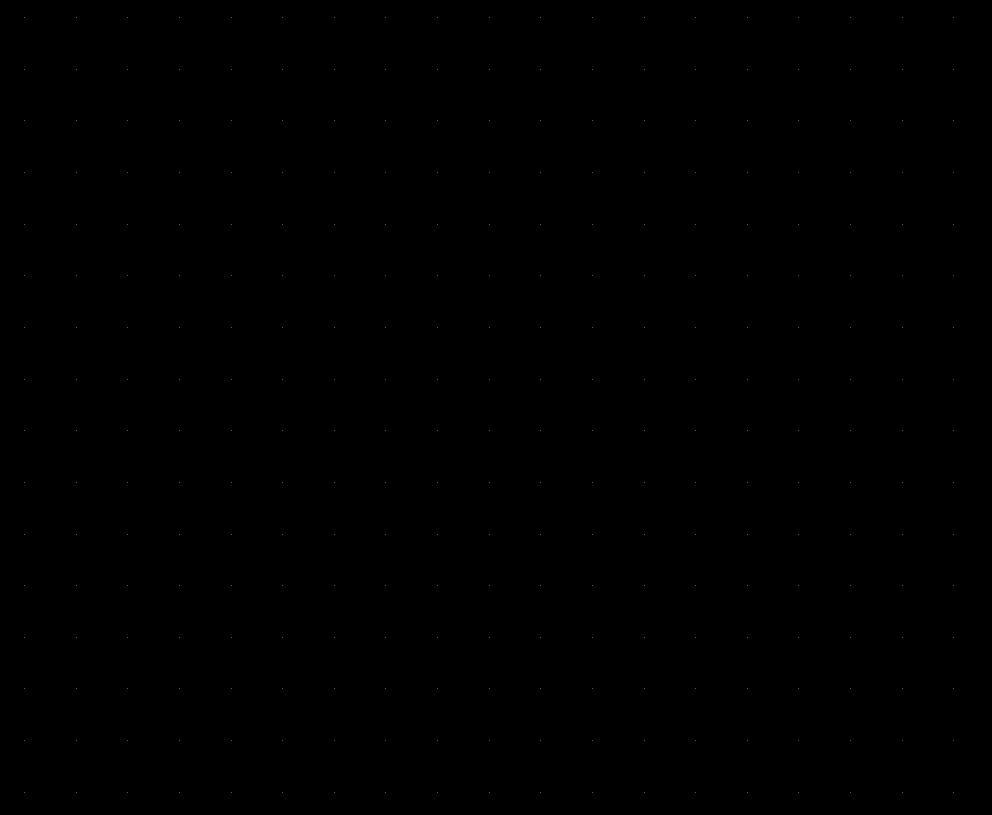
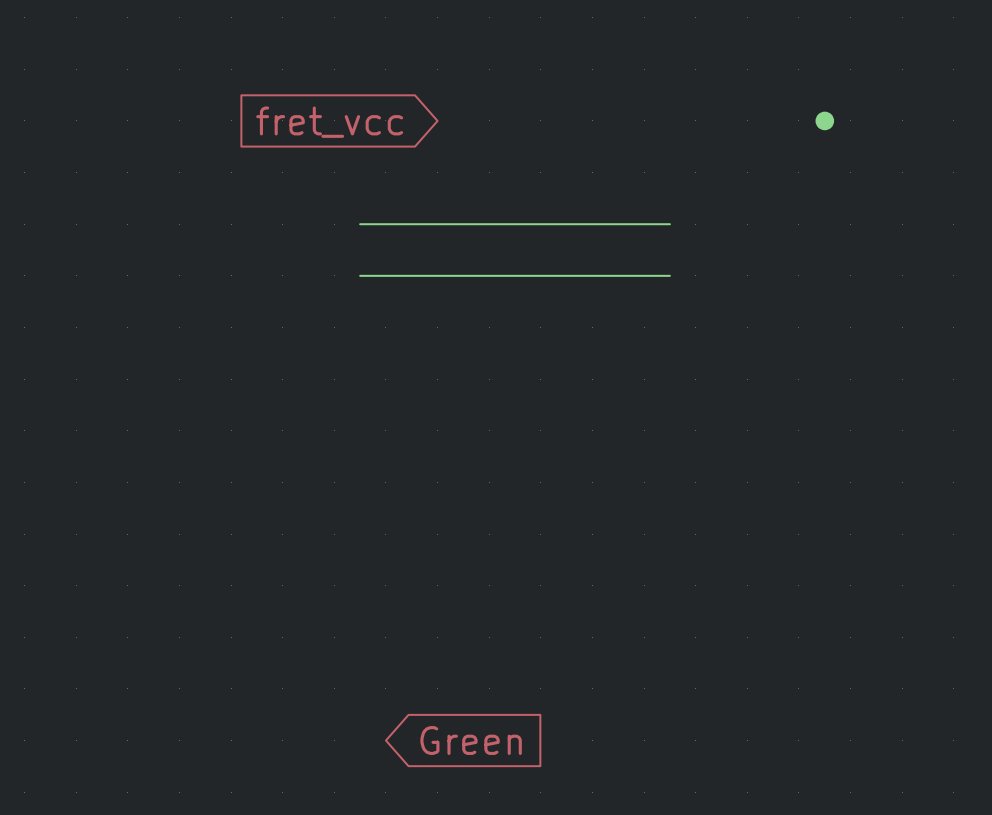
junction: none -> (824, 120)
global label: none -> fret_vcc (329, 122)
wire: none -> (360, 224) (669, 224)
wire: none -> (360, 275) (669, 275)
global label: none -> Green (471, 740)

